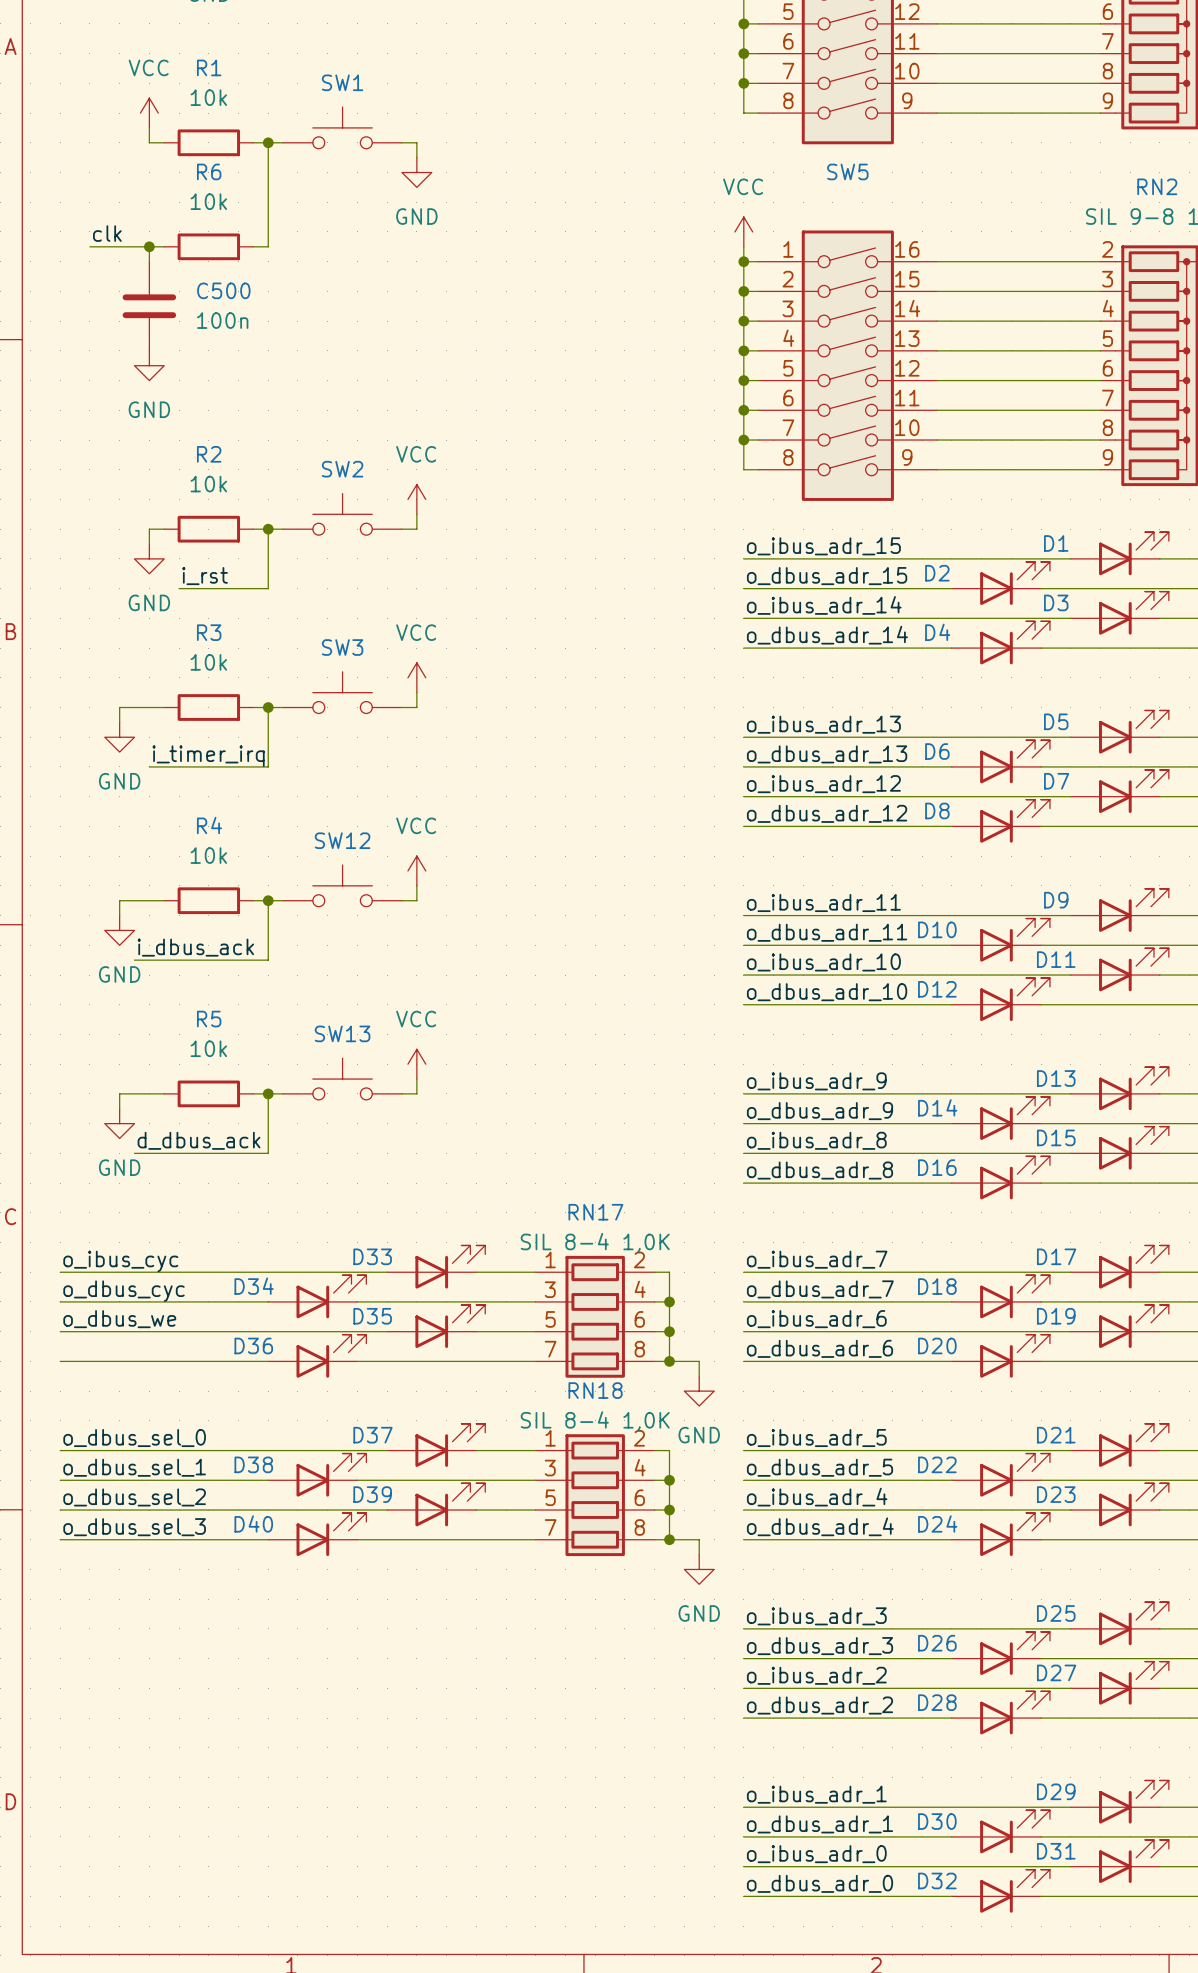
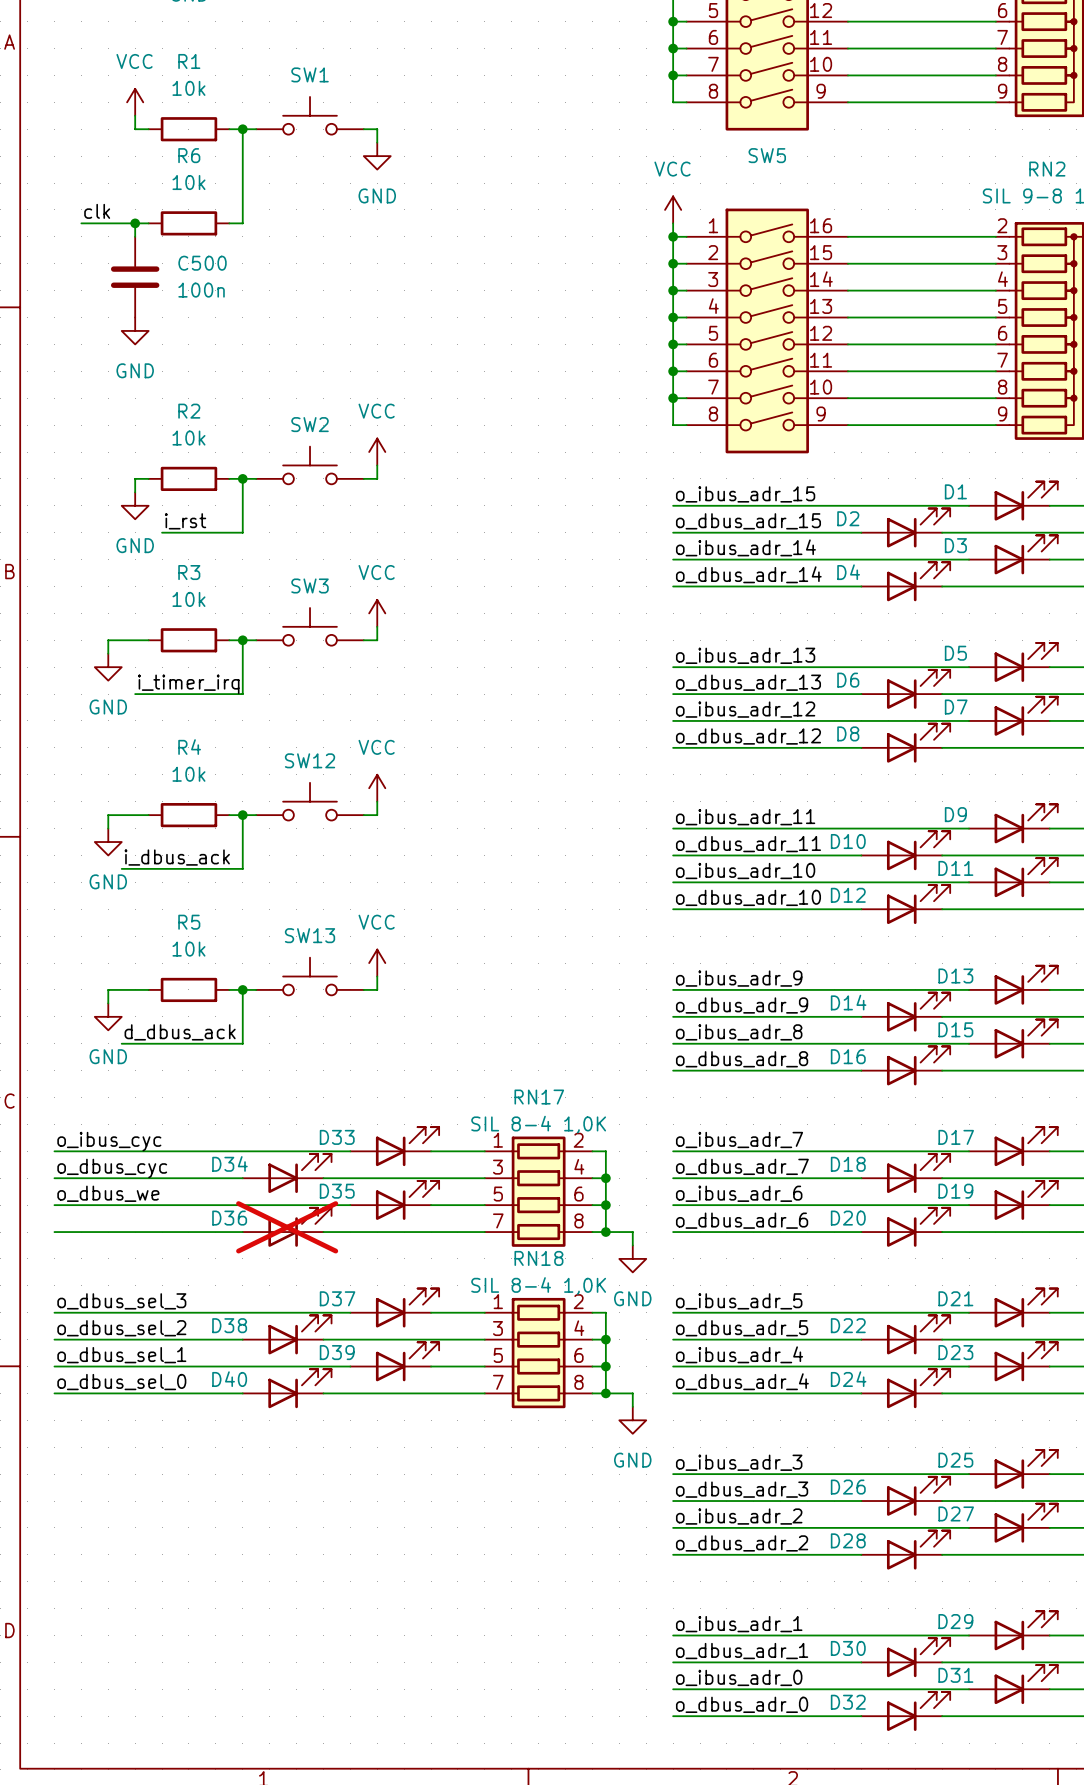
D36 do-not-place cross: none -> (287, 1227)
label: o_dbus_sel_0 (134, 1438) -> o_dbus_sel_3 (121, 1301)
label: o_dbus_sel_1 (134, 1467) -> o_dbus_sel_2 (121, 1328)
label: o_dbus_sel_2 (134, 1497) -> o_dbus_sel_1 (121, 1355)
label: o_dbus_sel_3 (134, 1527) -> o_dbus_sel_0 (121, 1382)

